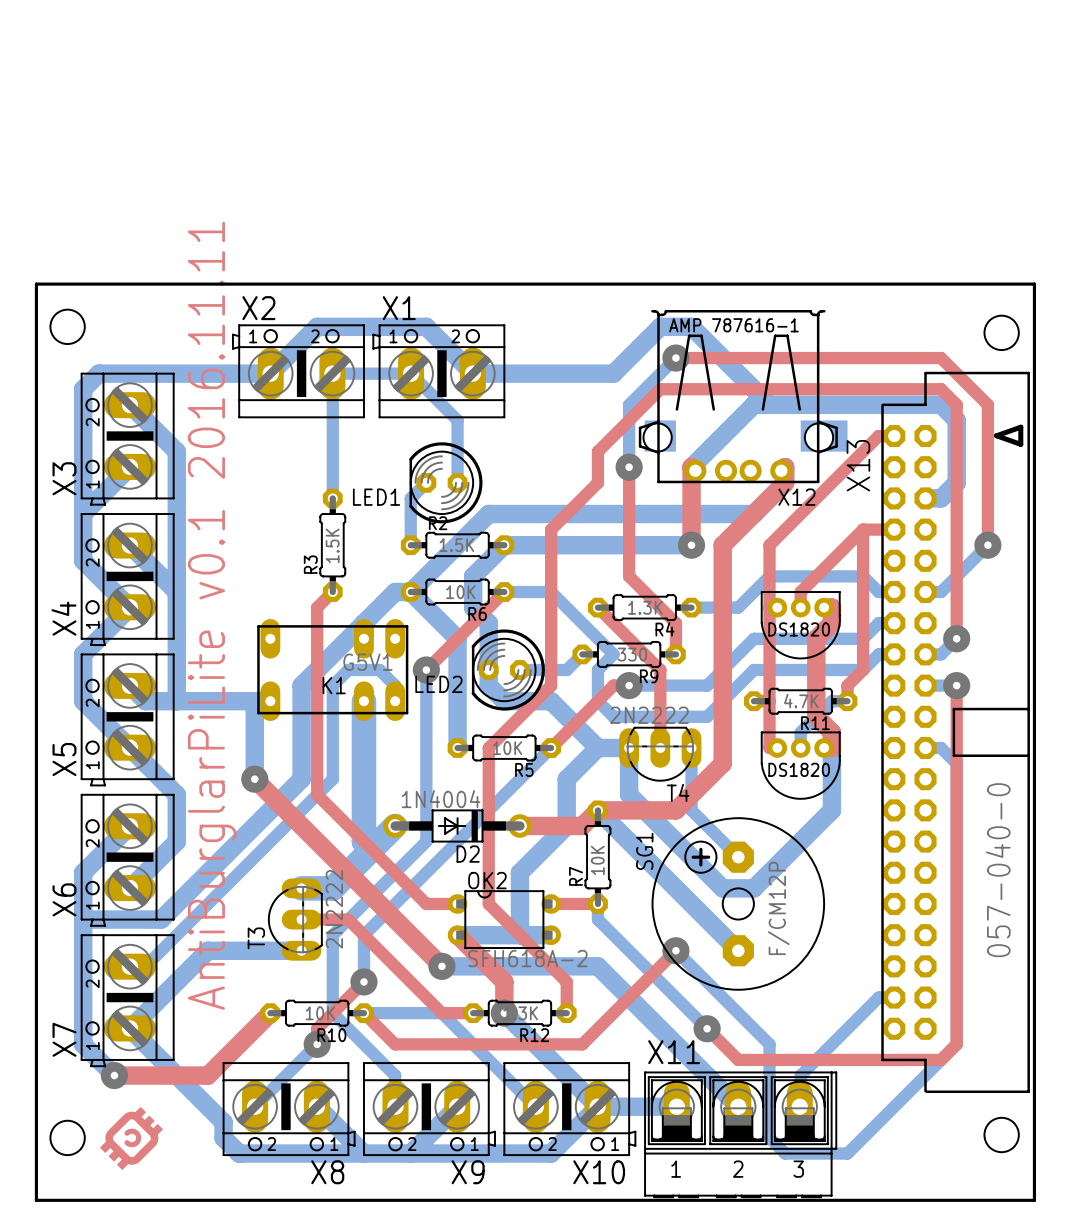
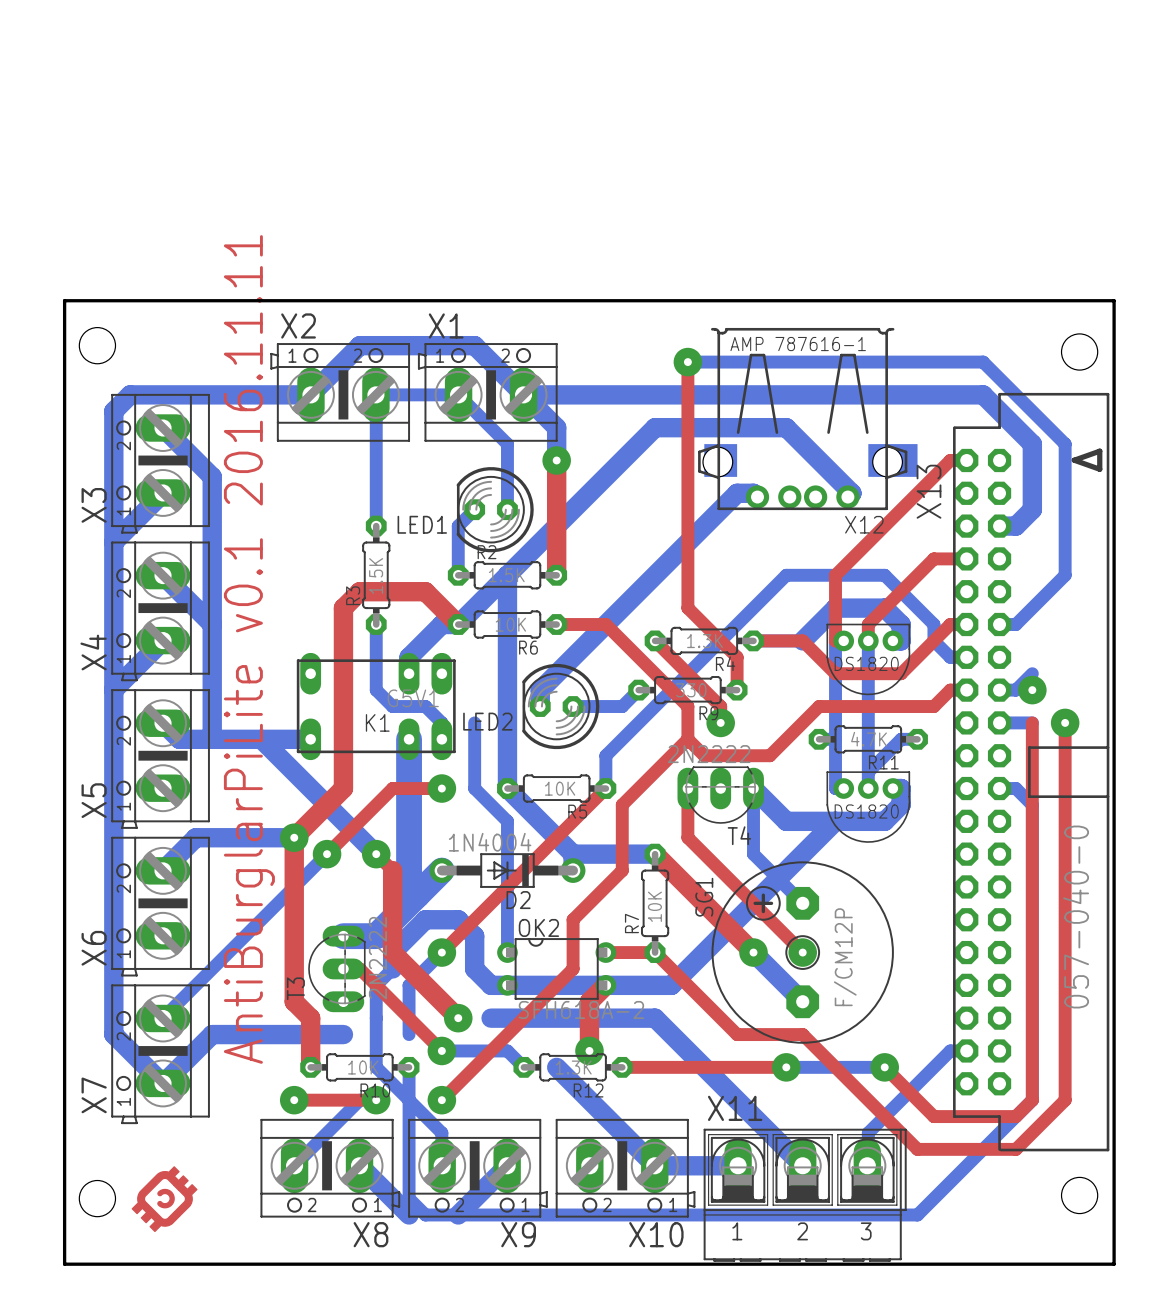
bottom track: none -> (687, 362) (983, 362) (1065, 444) (1065, 575)
top track: none -> (687, 362) (687, 493)
bottom track: (675, 358) (629, 404) (629, 467) -> none
top track: (675, 358) (941, 358) (987, 404) (987, 545) -> none
via position: (675, 358) -> (687, 362)
bottom track: none -> (523, 394) (556, 427) (556, 460)
bottom track: (613, 373) (660, 326) (691, 326) (769, 404) -> none
bottom track: (941, 404) (753, 404) (691, 467) -> (1015, 427) (983, 394) (671, 394)
top track: none -> (556, 460) (556, 575)
via: none -> (556, 460)
via: (629, 467) -> none
bottom track: (785, 467) (785, 482) (753, 514) (488, 514) -> (851, 493) (786, 427) (655, 427) (540, 542)
top track: (695, 470) (691, 467) (691, 545) -> none
top track: (781, 470) (785, 467) (785, 482) (722, 545) (722, 763) (675, 810) (597, 810) (582, 825) (519, 825) -> none
top track: (863, 529) (863, 670) (847, 685) (847, 701) -> none
bottom track: (691, 545) (504, 545) (473, 576) (473, 607) (488, 623) (488, 654) -> (753, 493) (737, 493) (540, 690)
via: (691, 545) -> none
via: (987, 545) -> none
bottom track: (83, 560) (130, 607) -> (113, 591) (113, 690)
bottom track: (816, 576) (863, 576) (878, 592) (894, 592) -> (884, 608) (901, 624) (901, 640) (892, 640)
bottom track width: thin (816, 576) (769, 576) (738, 607) -> thick (884, 608) (835, 608) (802, 640)
bottom track: none -> (376, 624) (376, 690) (392, 706)
top track: (332, 592) (317, 607) (317, 794) (332, 810) -> none
bottom track: (410, 592) (457, 638) -> (507, 575) (507, 673)
bottom track: (504, 592) (551, 592) (613, 654) -> none
top track: (504, 592) (426, 670) -> (556, 624) (605, 624) (687, 706) (687, 739)
top track: none -> (966, 624) (950, 624) (901, 673) (835, 673) (802, 640) (753, 640)
top track: (769, 607) (769, 747) (777, 747) -> none
bottom track: none -> (843, 640) (835, 640) (835, 788) (843, 788)
bottom track: none -> (868, 640) (868, 772)
top track: (824, 607) (831, 607) (831, 623) (816, 638) (816, 716) (831, 732) (831, 747) (824, 747) -> none
bottom track: (363, 623) (301, 685) (301, 779) (161, 919) (83, 919) -> none
bottom track: (878, 623) (863, 638) (753, 638) (707, 685) (629, 685) -> (950, 657) (933, 640) (933, 624) (884, 575) (786, 575) (671, 690)
top track: (956, 638) (956, 404) (941, 389) (660, 389) (597, 451) (597, 482) (551, 529) (551, 685) (488, 747) (488, 903) (566, 981) (566, 1013) -> (786, 1067) (622, 1067)
via: (956, 638) -> none
bottom track: (894, 654) (878, 654) (863, 670) (753, 670) (707, 716) (613, 716) (597, 701) (597, 670) -> none
top track: none -> (966, 690) (950, 690) (933, 706) (819, 706) (769, 755) (704, 755) (687, 739)
via: none -> (1032, 690)
bottom track: (348, 670) (332, 685) (332, 779) (145, 966) (130, 966) -> (327, 854) (163, 1018)
via: (426, 670) -> none
bottom track: (488, 670) (488, 685) (504, 701) (551, 701) (597, 747) -> none
top track: (629, 685) (613, 685) (551, 747) -> (441, 952) (605, 788)
via position: (629, 685) -> (720, 722)
top track: (660, 685) (660, 747) -> none
via: (956, 685) -> none
top track: none -> (1065, 722) (1065, 1100) (1015, 1149) (917, 1149) (802, 1034) (737, 1034) (655, 952)
via: none -> (1065, 722)
bottom track: (83, 701) (176, 794) (176, 841) (130, 888) -> (113, 739) (113, 919)
bottom track: none -> (261, 739) (376, 854)
bottom track: (254, 701) (254, 779) -> none
top track: none -> (687, 739) (622, 804) (622, 870) (573, 919) (573, 968) (441, 1100)
top track: none -> (441, 788) (392, 788) (327, 854)
via: none -> (441, 788)
bottom track: (426, 747) (426, 841) (348, 919) -> (474, 788) (507, 821) (507, 952)
bottom track: none -> (507, 788) (573, 854)
bottom track: (551, 747) (395, 903) -> (605, 788) (605, 755) (655, 706)
bottom track: (597, 747) (629, 747) (629, 794) (722, 888) (753, 888) (831, 810) (831, 763) -> (753, 788) (786, 821) (884, 821) (901, 804)
bottom track: (597, 747) (566, 779) (566, 825) (519, 872) (519, 935) -> none
top track: none -> (687, 788) (687, 837) (802, 952)
top track: (254, 779) (441, 966) -> none
via position: (254, 779) -> (294, 837)
bottom track: none -> (835, 821) (671, 985) (605, 985)
via: none -> (327, 854)
via: none -> (376, 854)
bottom track: (597, 810) (691, 903) -> (655, 854) (573, 854)
top track: none -> (655, 854) (753, 952)
bottom track: (130, 825) (83, 872) -> (163, 870) (195, 837) (294, 837)
top track: (348, 825) (426, 903) (457, 903) -> (392, 870) (392, 952) (458, 1018)
via: none -> (441, 952)
bottom track: (597, 903) (597, 919) (707, 1028) -> none
via: none -> (753, 952)
via: none -> (802, 952)
top track: (317, 919) (348, 919) (441, 1013) (473, 1013) -> (359, 968) (441, 1050)
bottom track: none -> (392, 968) (392, 952) (425, 919) (458, 919) (474, 936) (474, 968) (491, 985) (507, 985)
top track: (457, 935) (504, 981) (504, 1013) -> none
top track: none -> (605, 985) (589, 1001) (589, 1050)
bottom track: (301, 950) (207, 950) (176, 981) -> (343, 1034) (212, 1034)
bottom track: (675, 950) (769, 1044) (769, 1137) (785, 1153) -> none
top track: (675, 950) (582, 1044) (395, 1044) (363, 1013) -> none
via: (675, 950) -> none
via: none -> (458, 1018)
via: (441, 966) -> none
bottom track: (83, 981) (83, 1044) (114, 1075) -> (113, 1034) (163, 1083)
top track: (363, 981) (317, 1028) (317, 1044) -> none
via: (363, 981) -> none
bottom track: none -> (441, 1050) (507, 1050) (523, 1067)
via: none -> (441, 1050)
top track: (270, 1013) (207, 1075) (114, 1075) -> (310, 1067) (310, 1018) (294, 1001) (294, 837) (343, 788) (343, 608) (359, 591) (425, 591) (458, 624)
bottom track: (363, 1013) (441, 1013) (535, 1106) -> (409, 1067) (409, 1198) (425, 1214)
via position: (504, 1013) -> (589, 1050)
bottom track: none -> (786, 1067) (884, 1067)
via: none -> (884, 1067)
bottom track: (130, 1028) (223, 1122) (223, 1137) (239, 1153) (379, 1153) -> none
top track: (707, 1028) (738, 1059) (863, 1059) -> (884, 1067) (933, 1116)
via position: (707, 1028) -> (786, 1067)
top track: none -> (294, 1100) (376, 1100)
via: none -> (294, 1100)
via position: (317, 1044) -> (376, 1100)
via: none -> (441, 1100)
via: (114, 1075) -> none
bottom track: (597, 1106) (551, 1153) -> (851, 1214) (605, 1214)
bottom track width: thick (379, 1153) (551, 1153) -> thin (425, 1214) (605, 1214)

